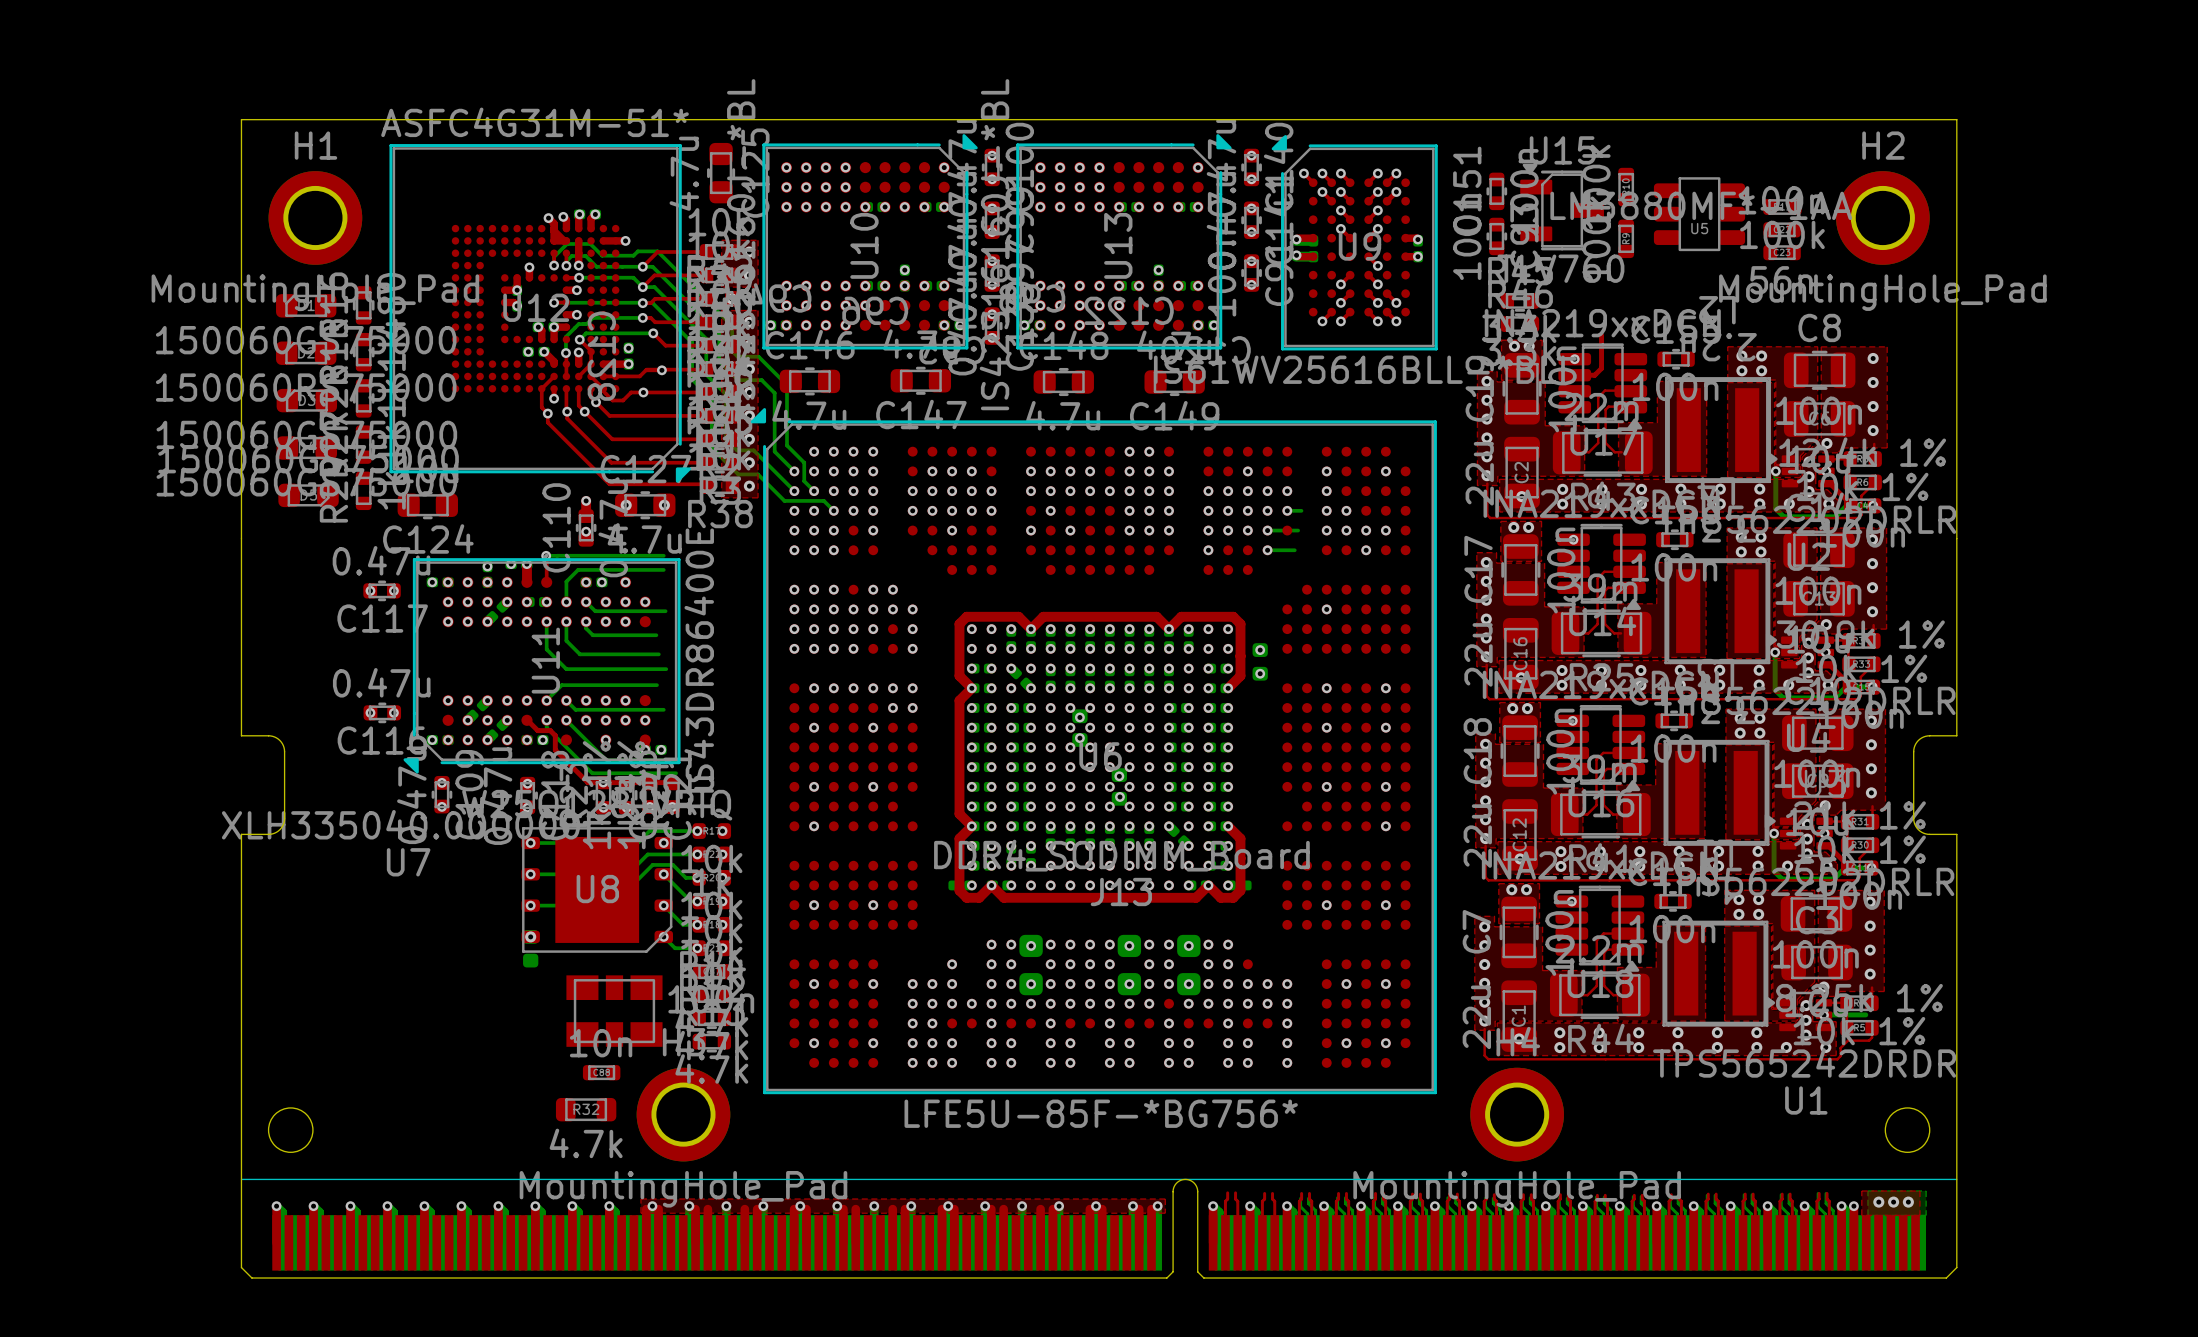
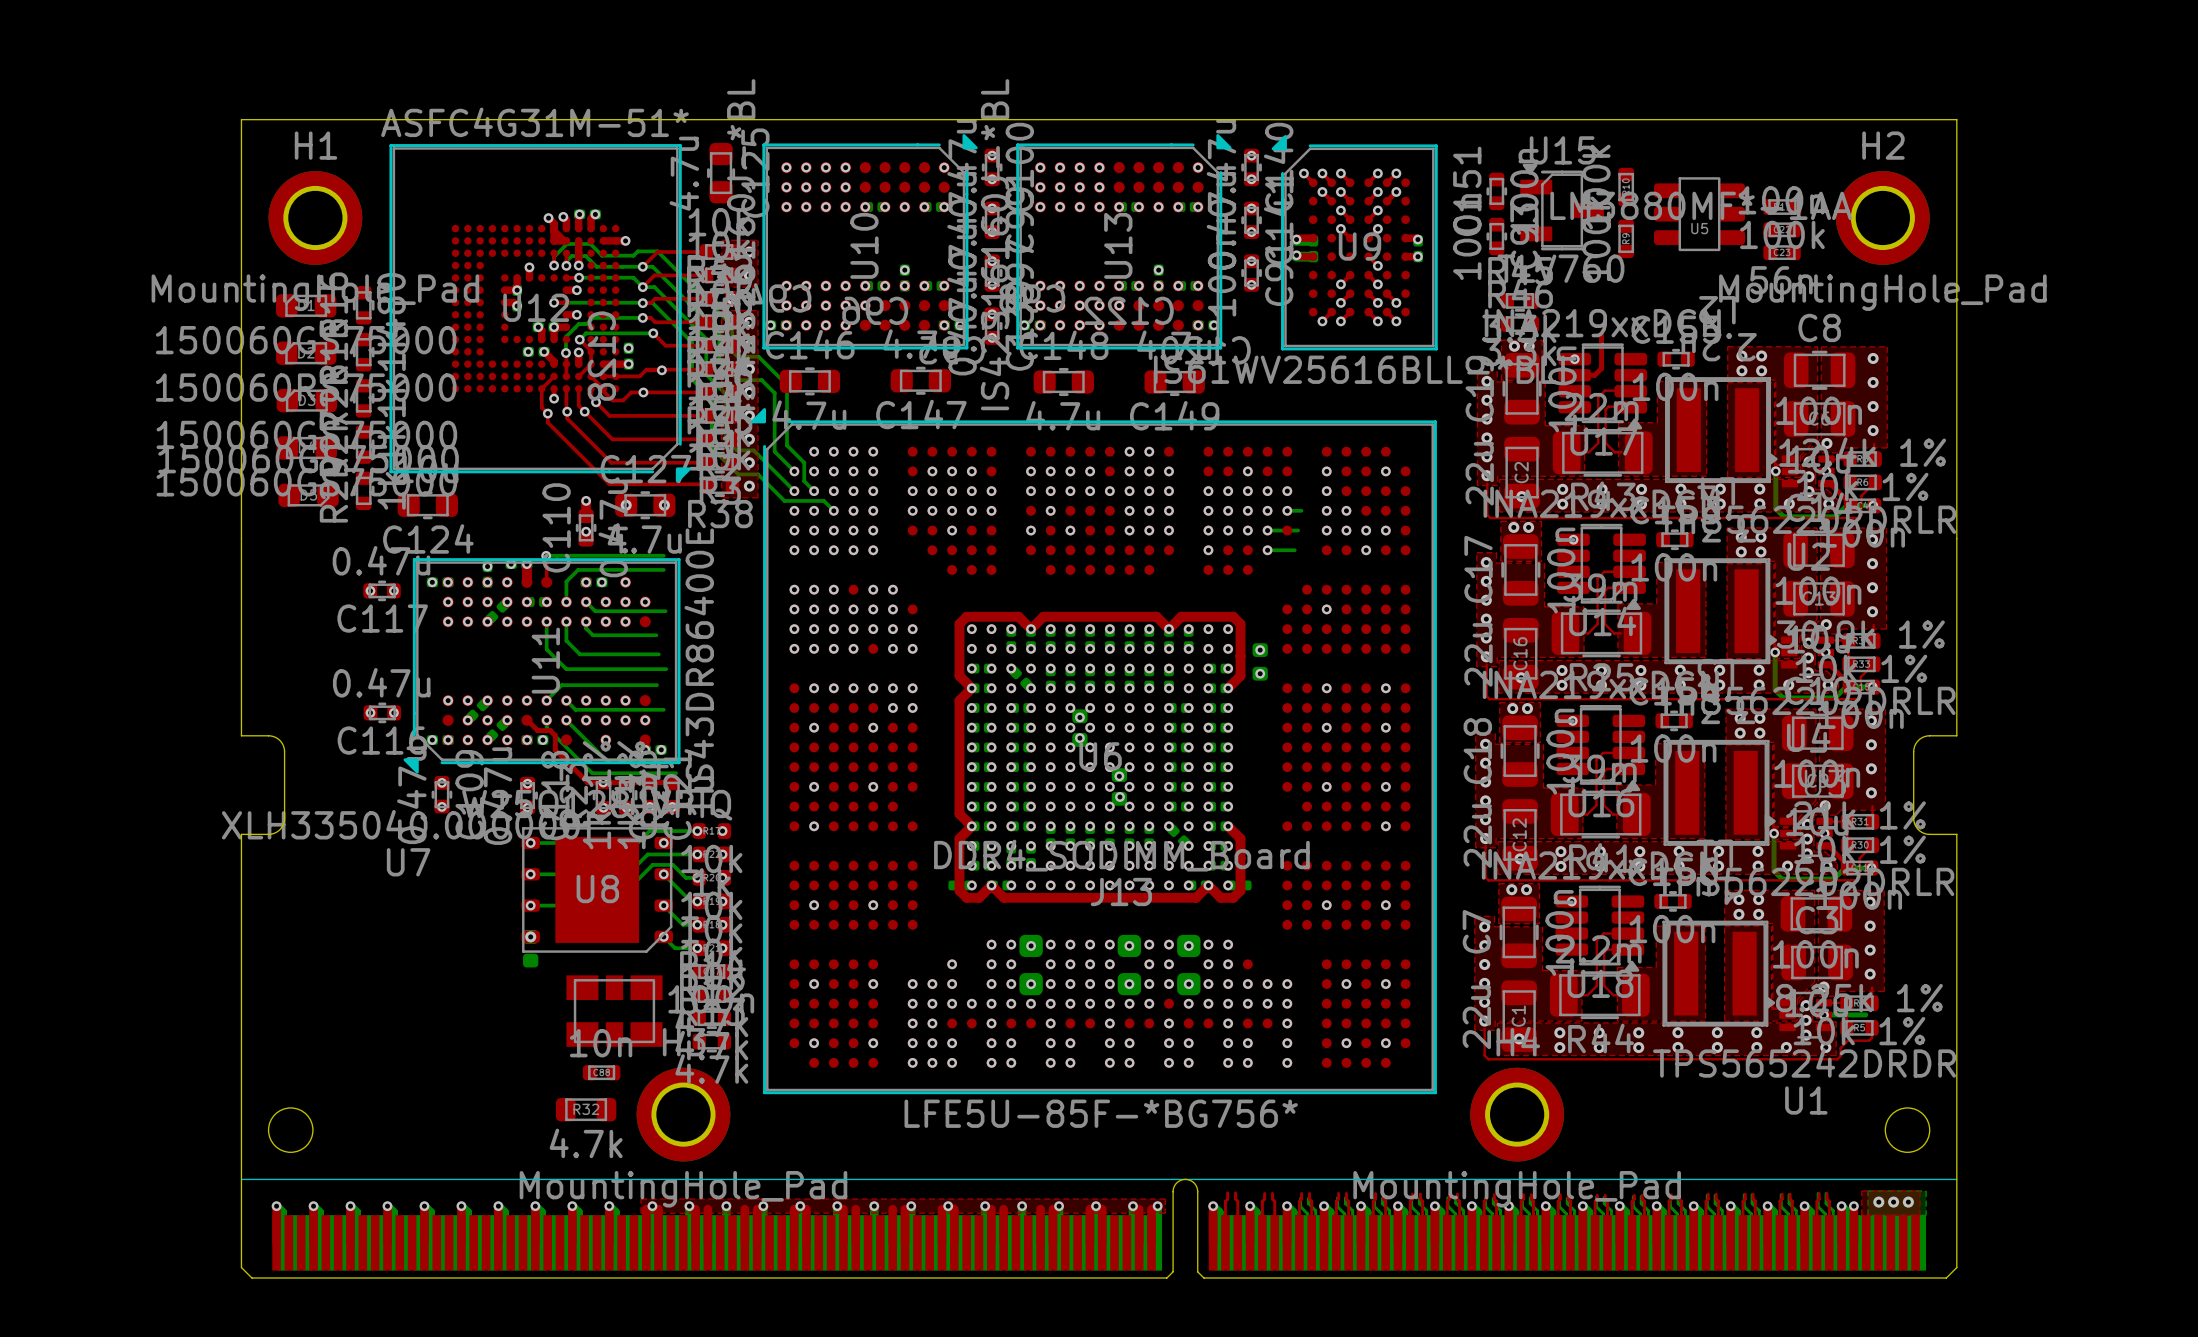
via: none -> (853, 530)
via: none -> (853, 550)
via: none -> (873, 550)
via: (912, 609) -> none
via: none -> (892, 629)
via: none -> (892, 648)

